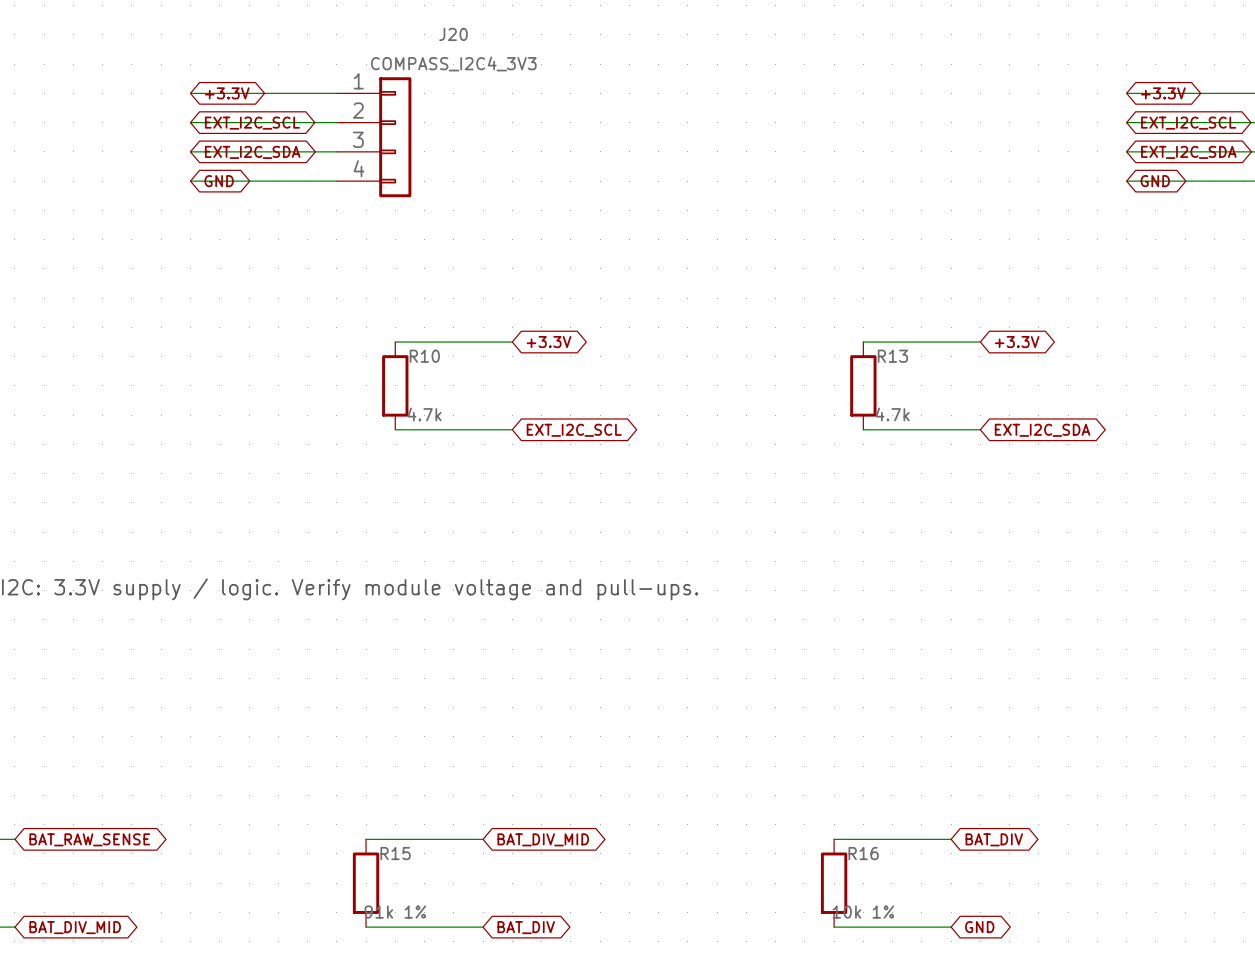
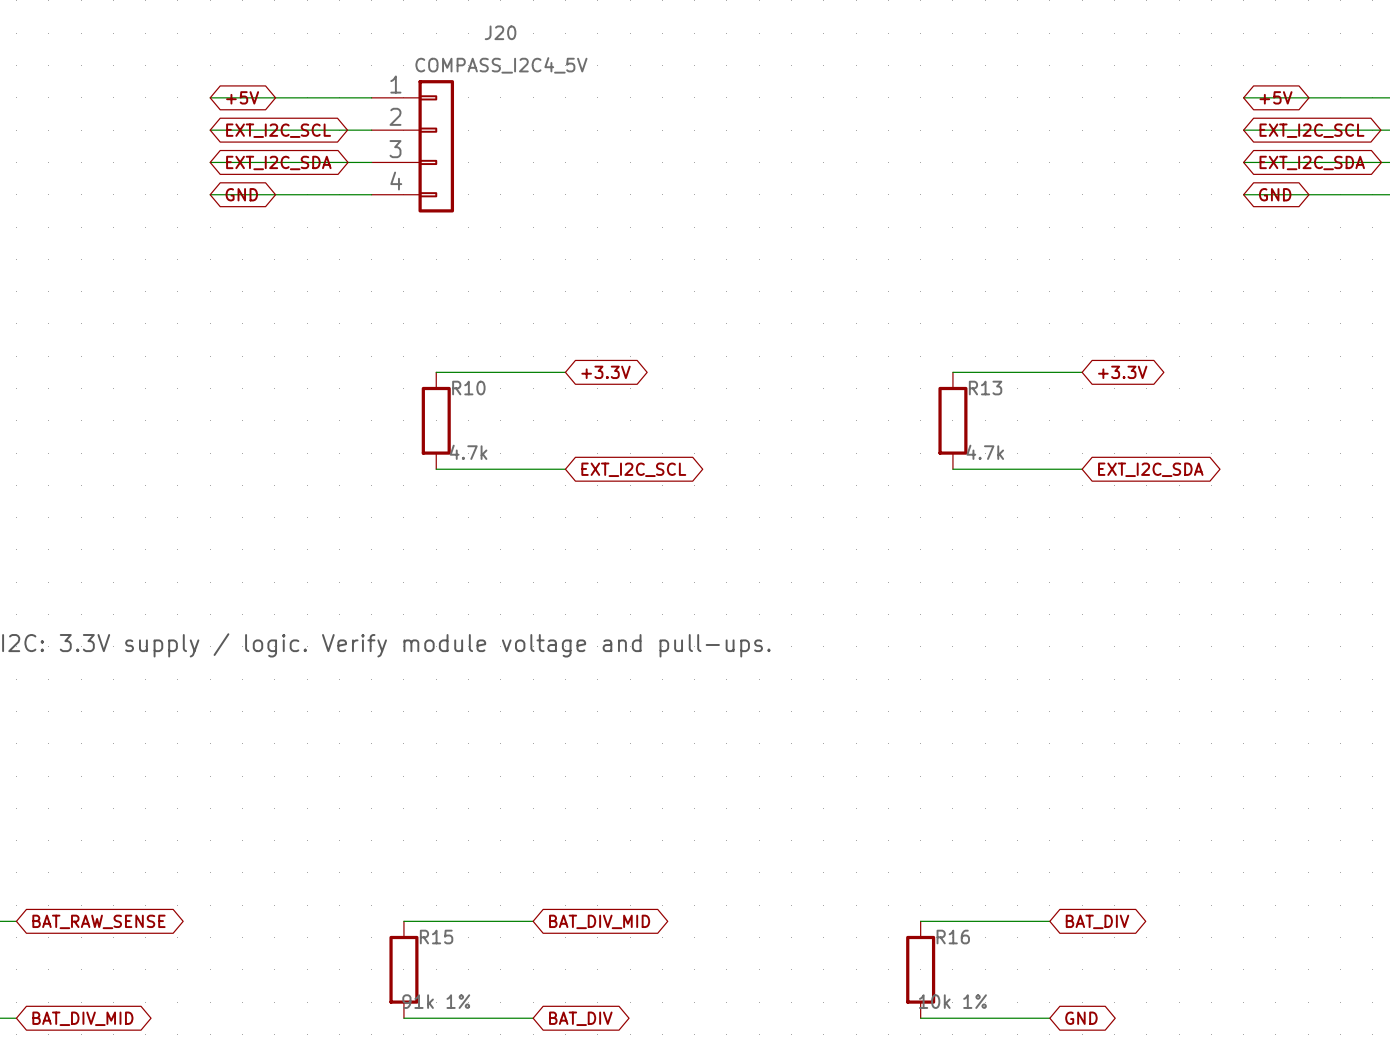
J20 value: COMPASS_I2C4_3V3 (453, 63) -> COMPASS_I2C4_5V (501, 65)
global label: +3.3V (227, 93) -> +5V (242, 97)
global label: +3.3V (1163, 93) -> +5V (1276, 97)

